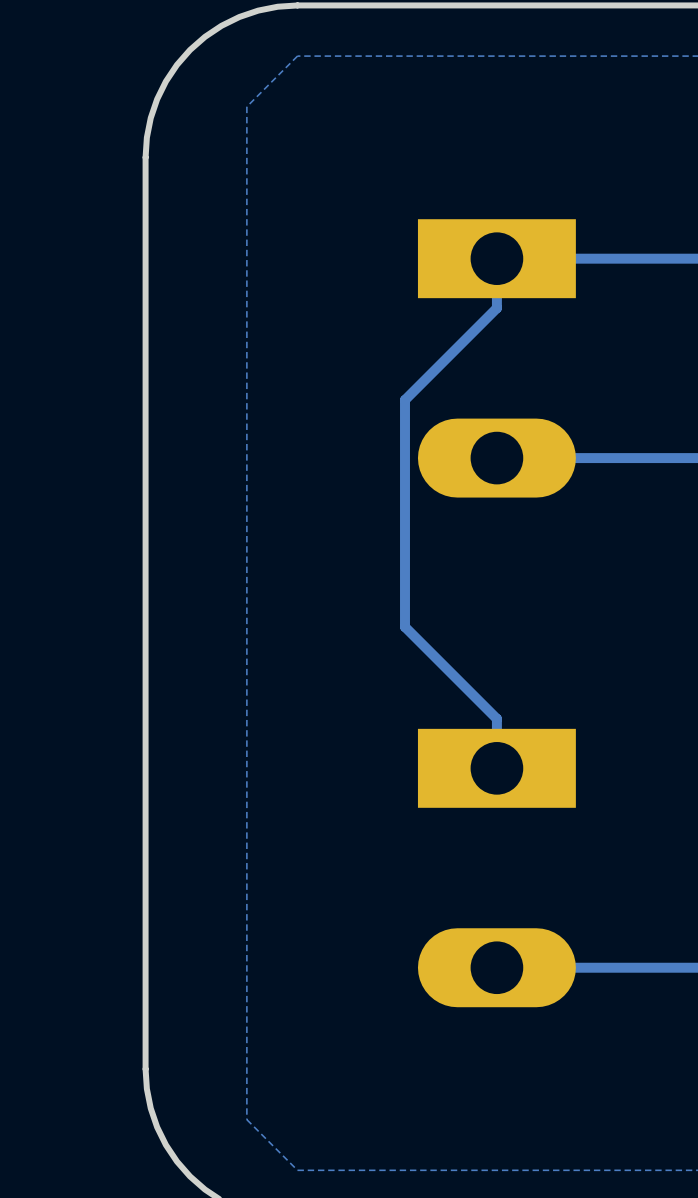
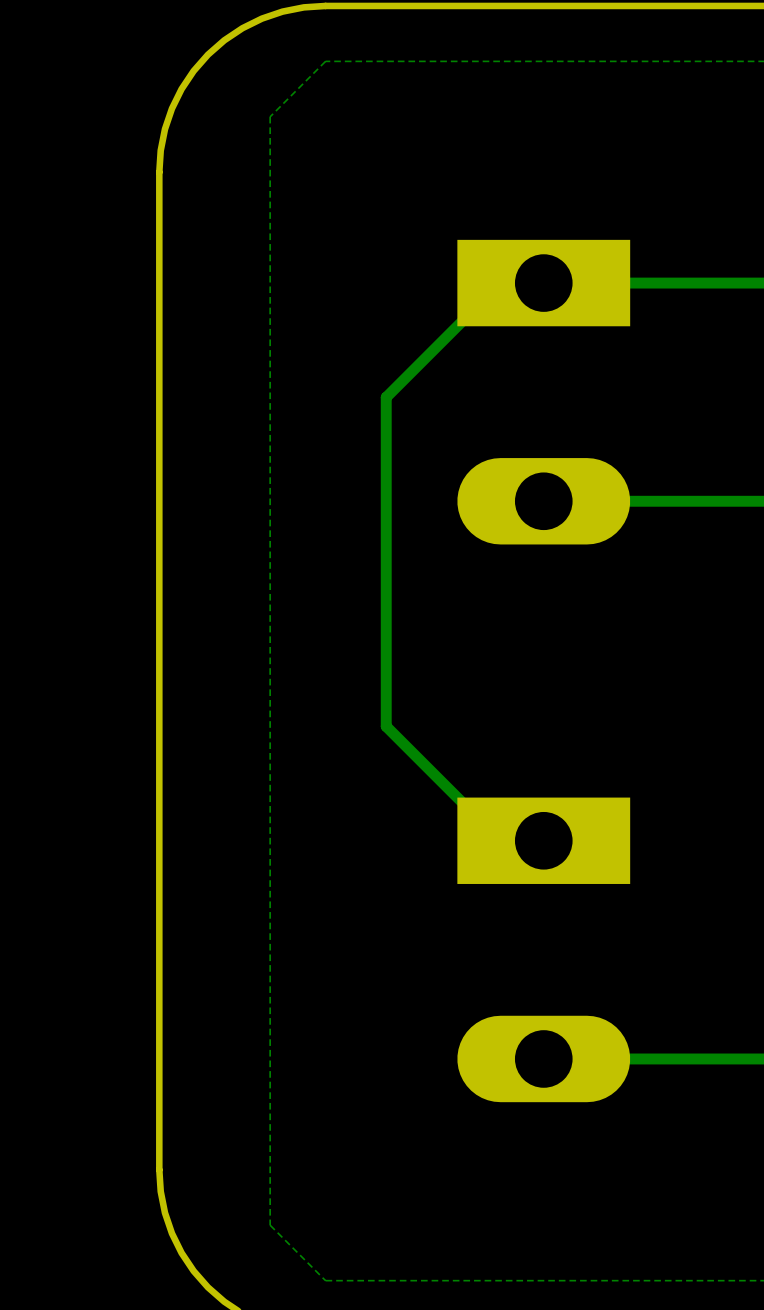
track: (496, 258) (496, 308) (405, 400) (405, 626) (496, 718) (496, 768) -> (543, 283) (500, 283) (386, 397) (386, 726) (500, 840) (543, 840)

